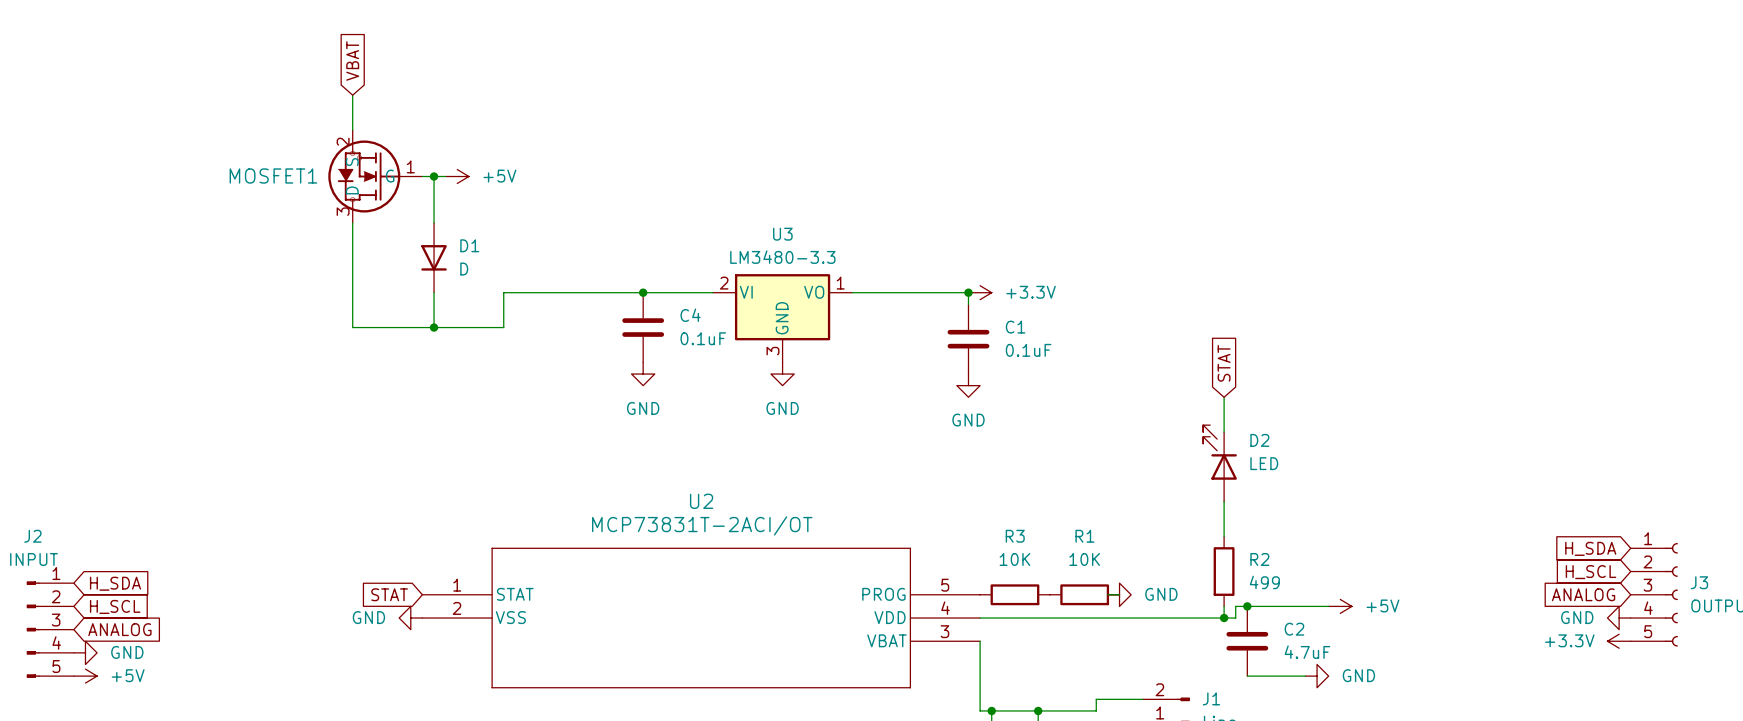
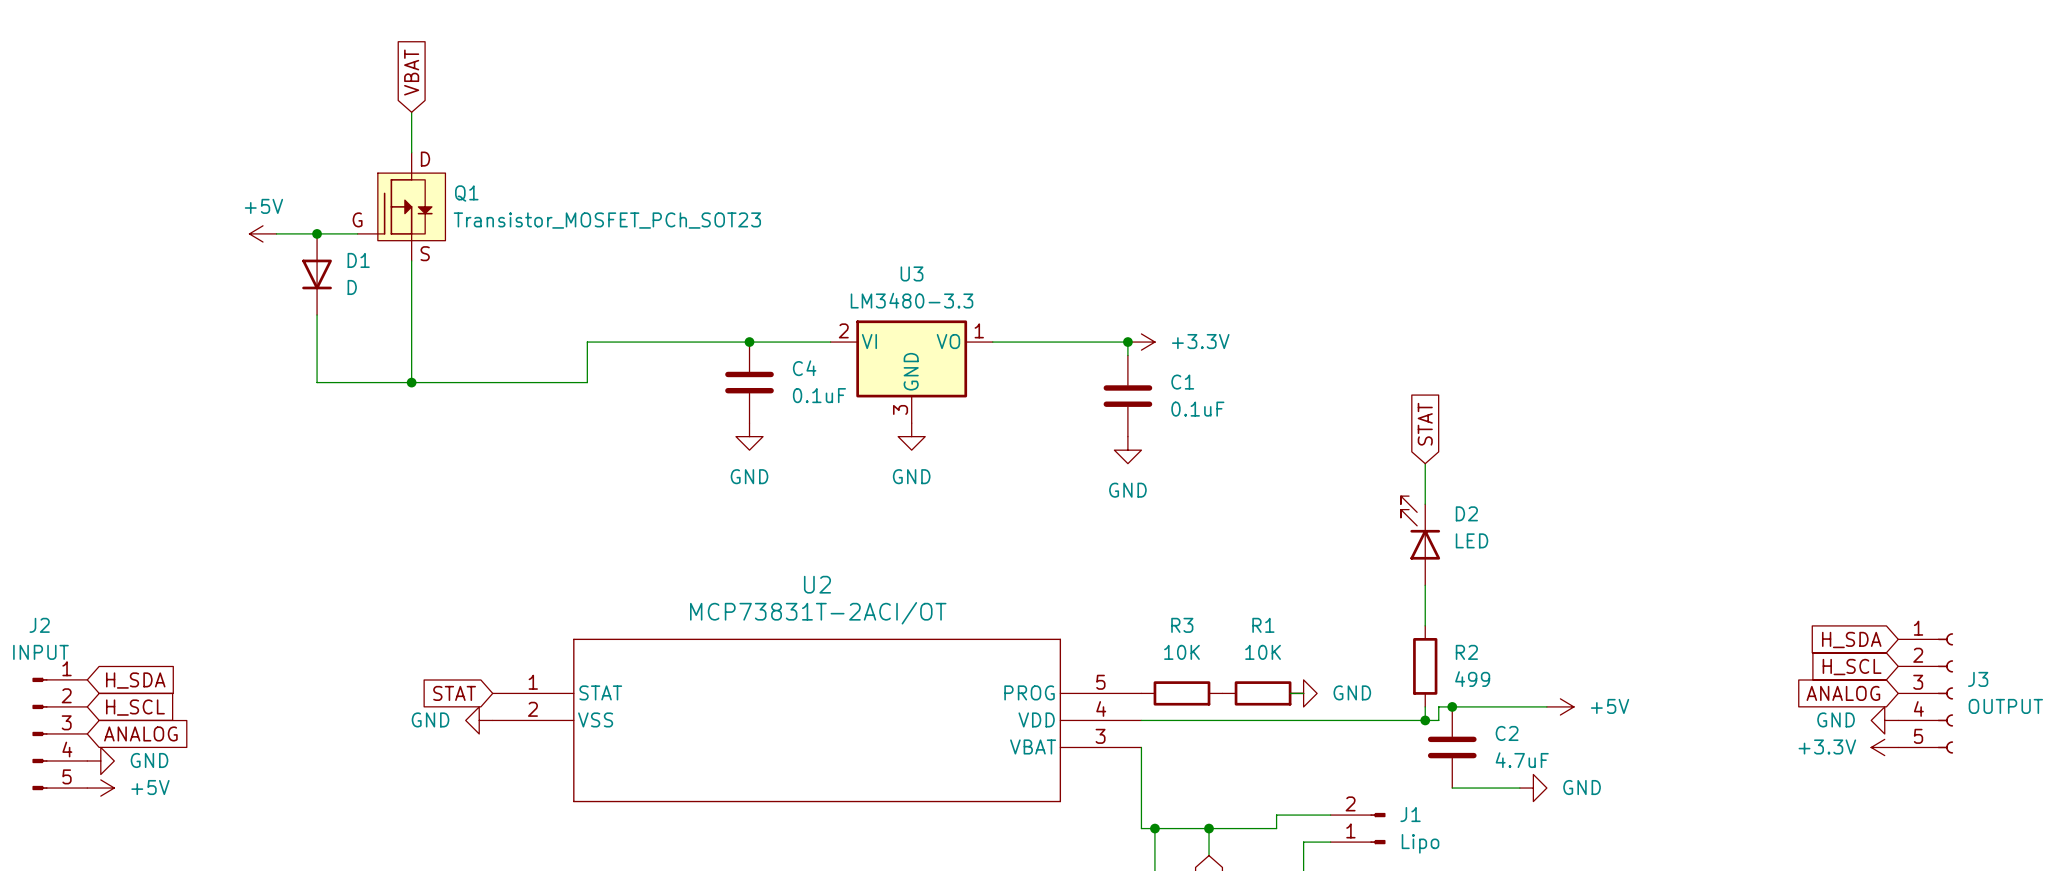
Q1: none -> Transistor_MOSFET_PCh_SOT23 (401, 206)
MOSFET1: (375, 176) -> none
wire: (422, 176) (445, 176) -> none
wire: (434, 176) (434, 222) -> none
junction: (434, 176) -> none
power symbol: +5V (457, 176) -> none
power symbol: none -> +5V (262, 233)
wire: none -> (276, 233) (357, 233)
junction: none -> (317, 233)
D1 position: (434, 257) -> (317, 274)
wire: none -> (317, 315) (317, 382) (411, 382)
wire: (434, 292) (434, 327) -> none
junction: none -> (411, 382)
junction: (434, 327) -> none

